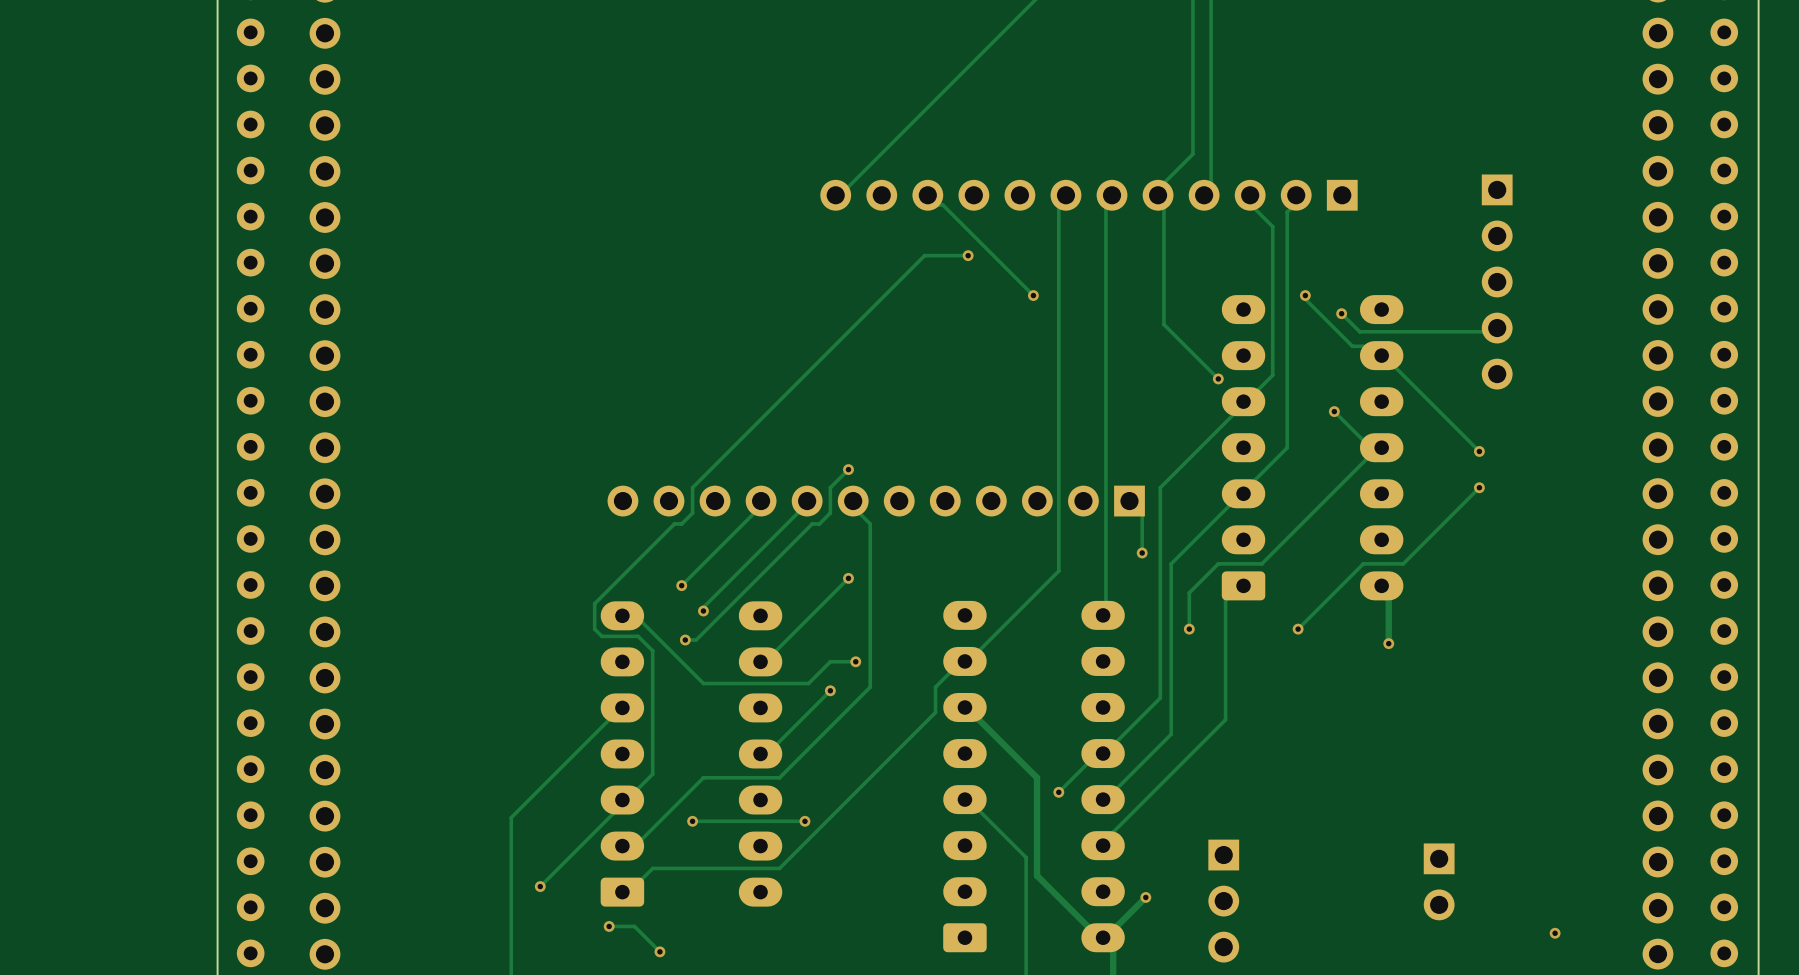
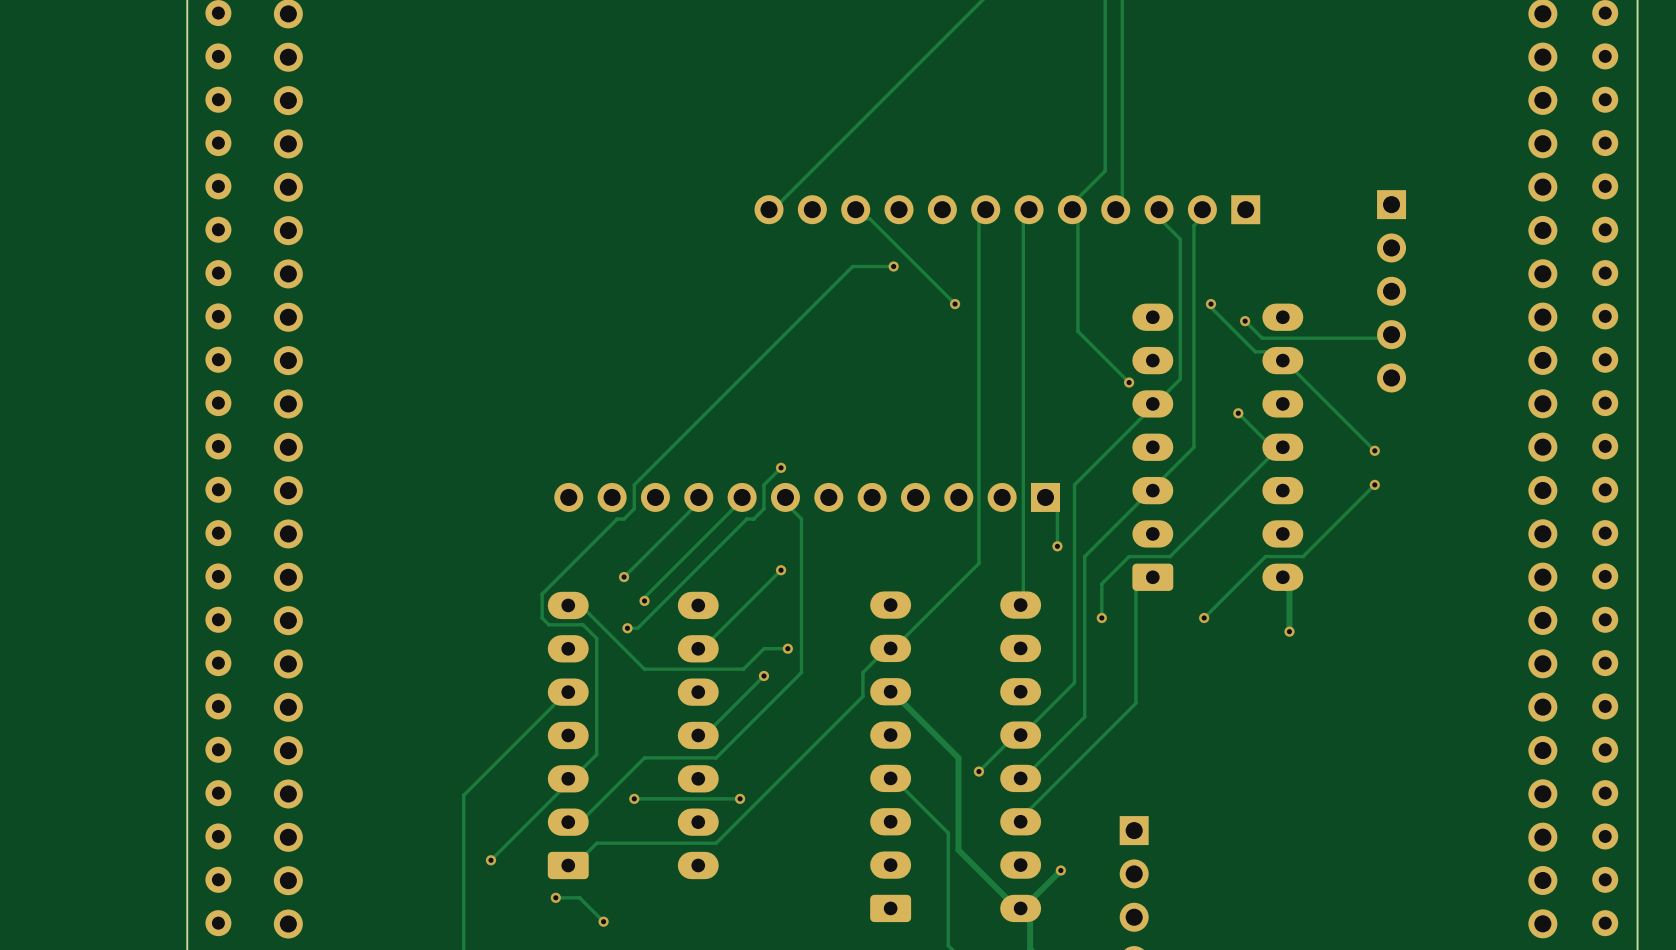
part: (1439, 881) -> none
via: (1555, 933) -> none

